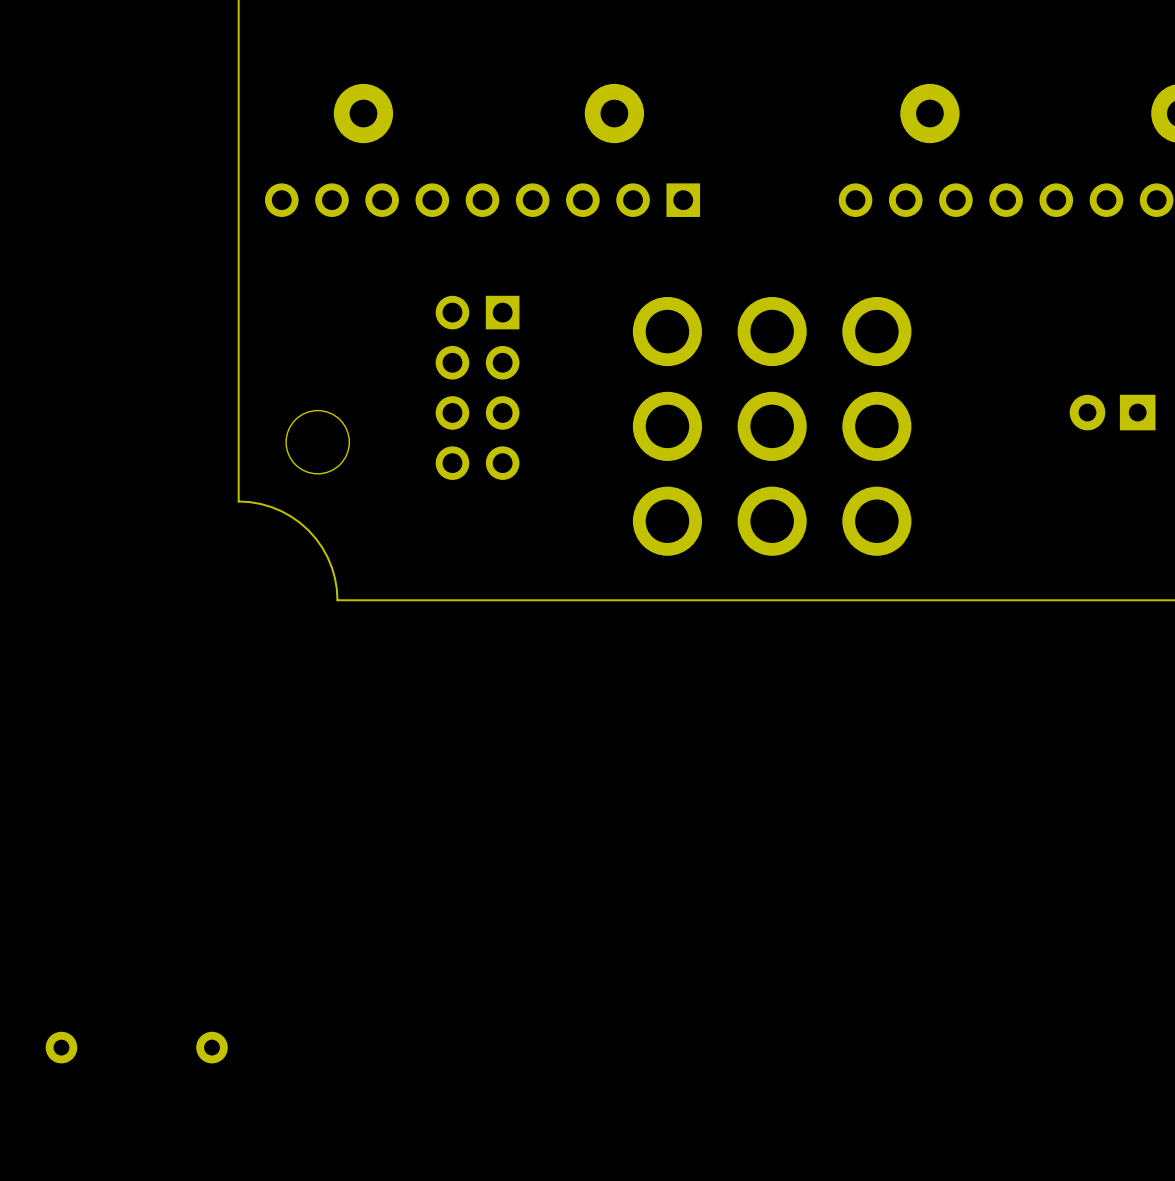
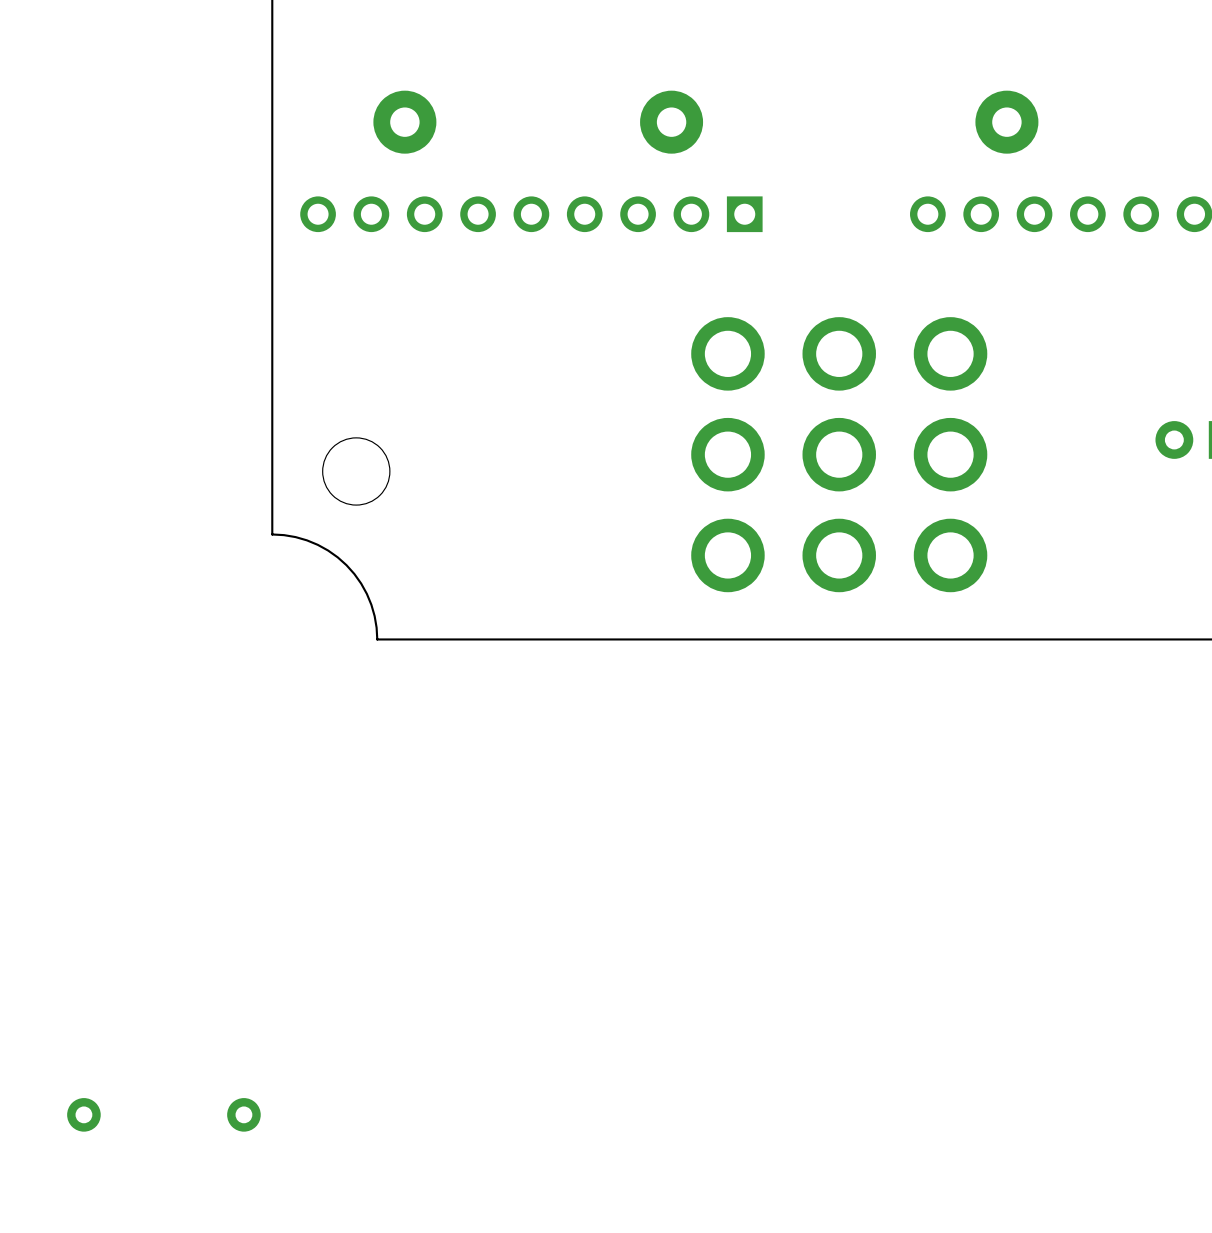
part: (477, 387) -> none

